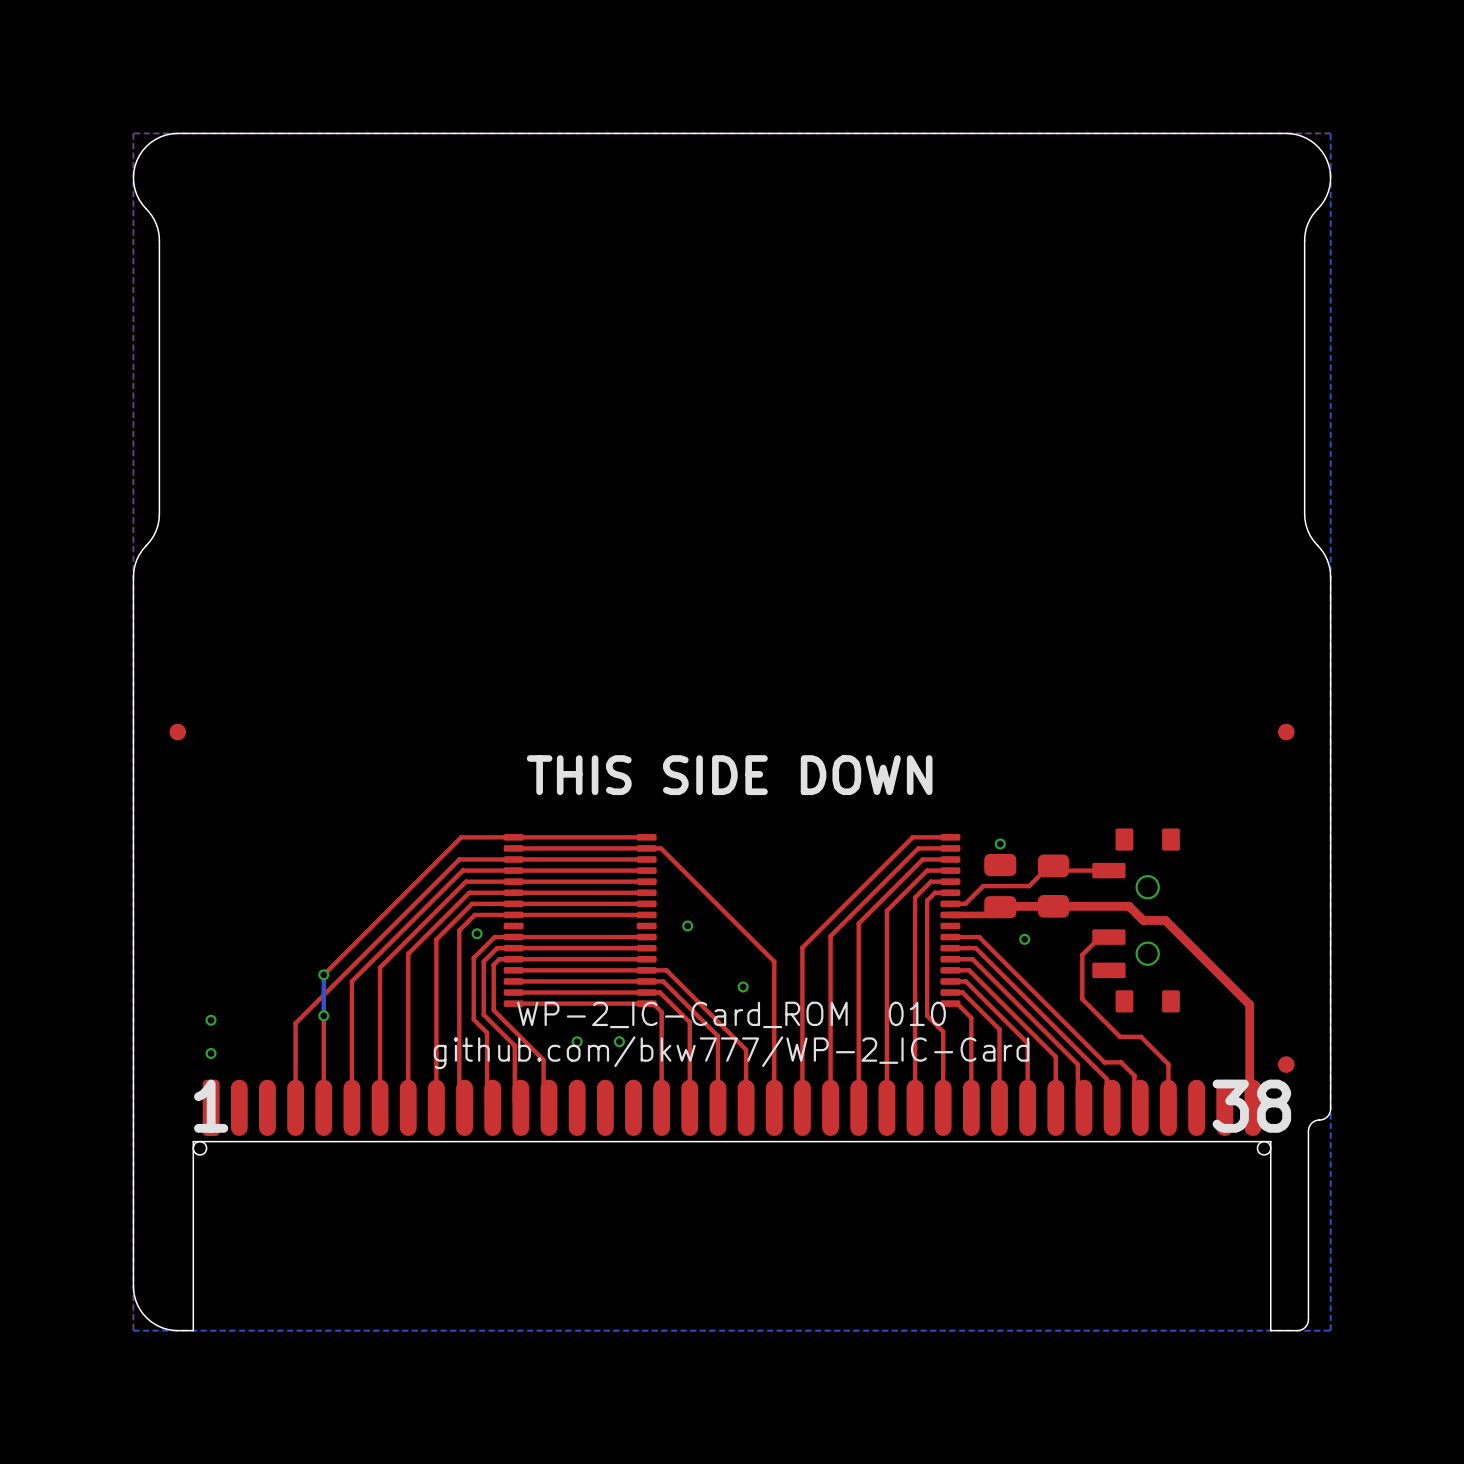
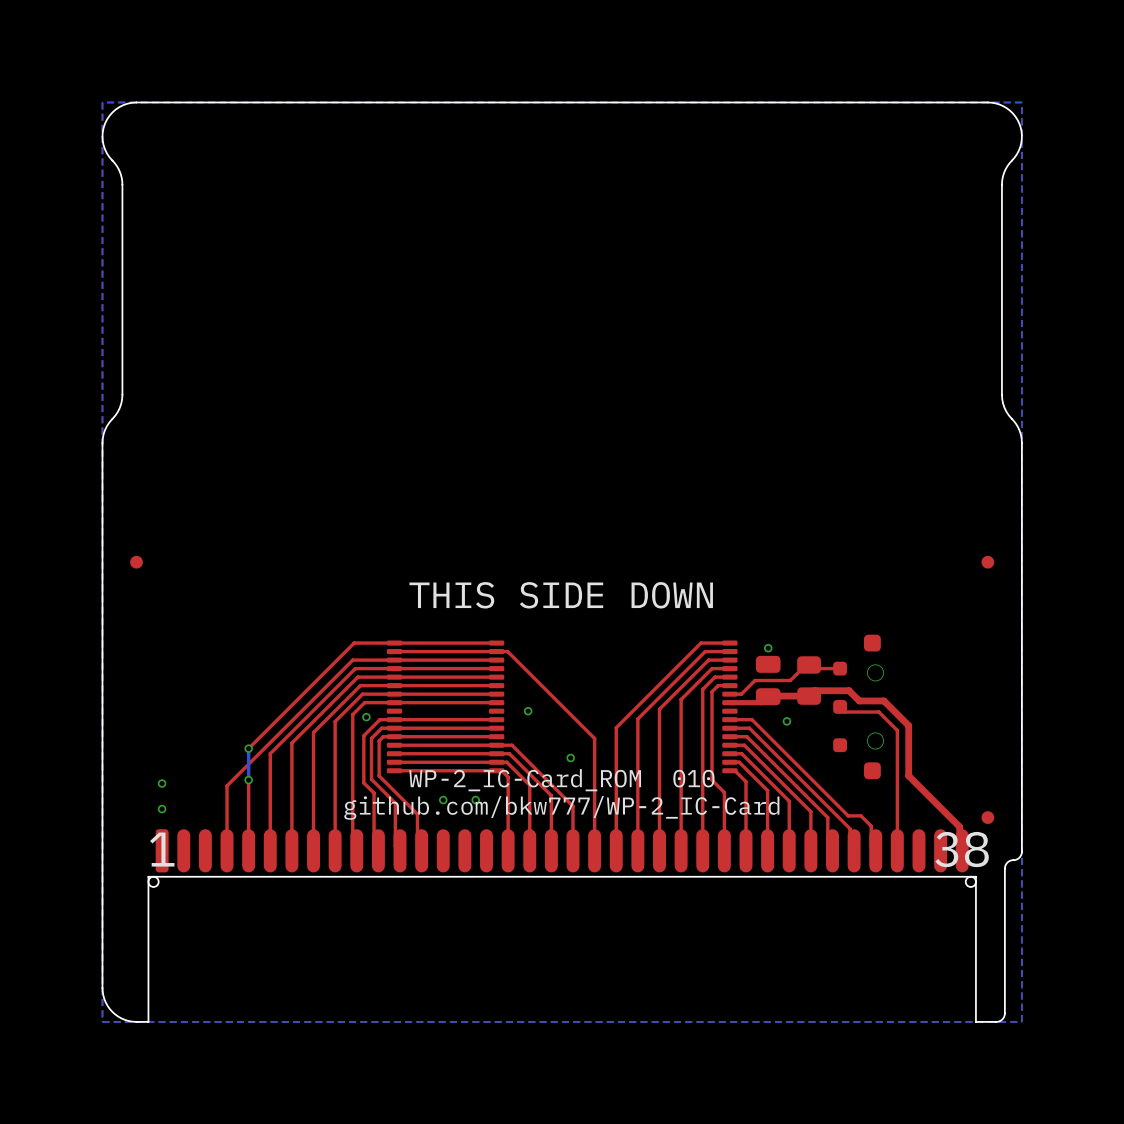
part footprint: [1092, 828, 1180, 1013] -> [833, 634, 885, 780]
top track: (1053, 906) (1129, 906) (1143, 920) (1165, 920) (1249, 1004) (1249, 1076) -> (809, 696) (814, 690) (849, 690) (859, 700) (884, 700) (908, 725) (908, 775) (959, 826)
top track: (1108, 937) (1100, 937) (1082, 954) (1082, 999) (1120, 1036) (1141, 1036) (1168, 1064) -> (840, 706) (845, 712) (878, 712) (897, 730) (897, 817)

